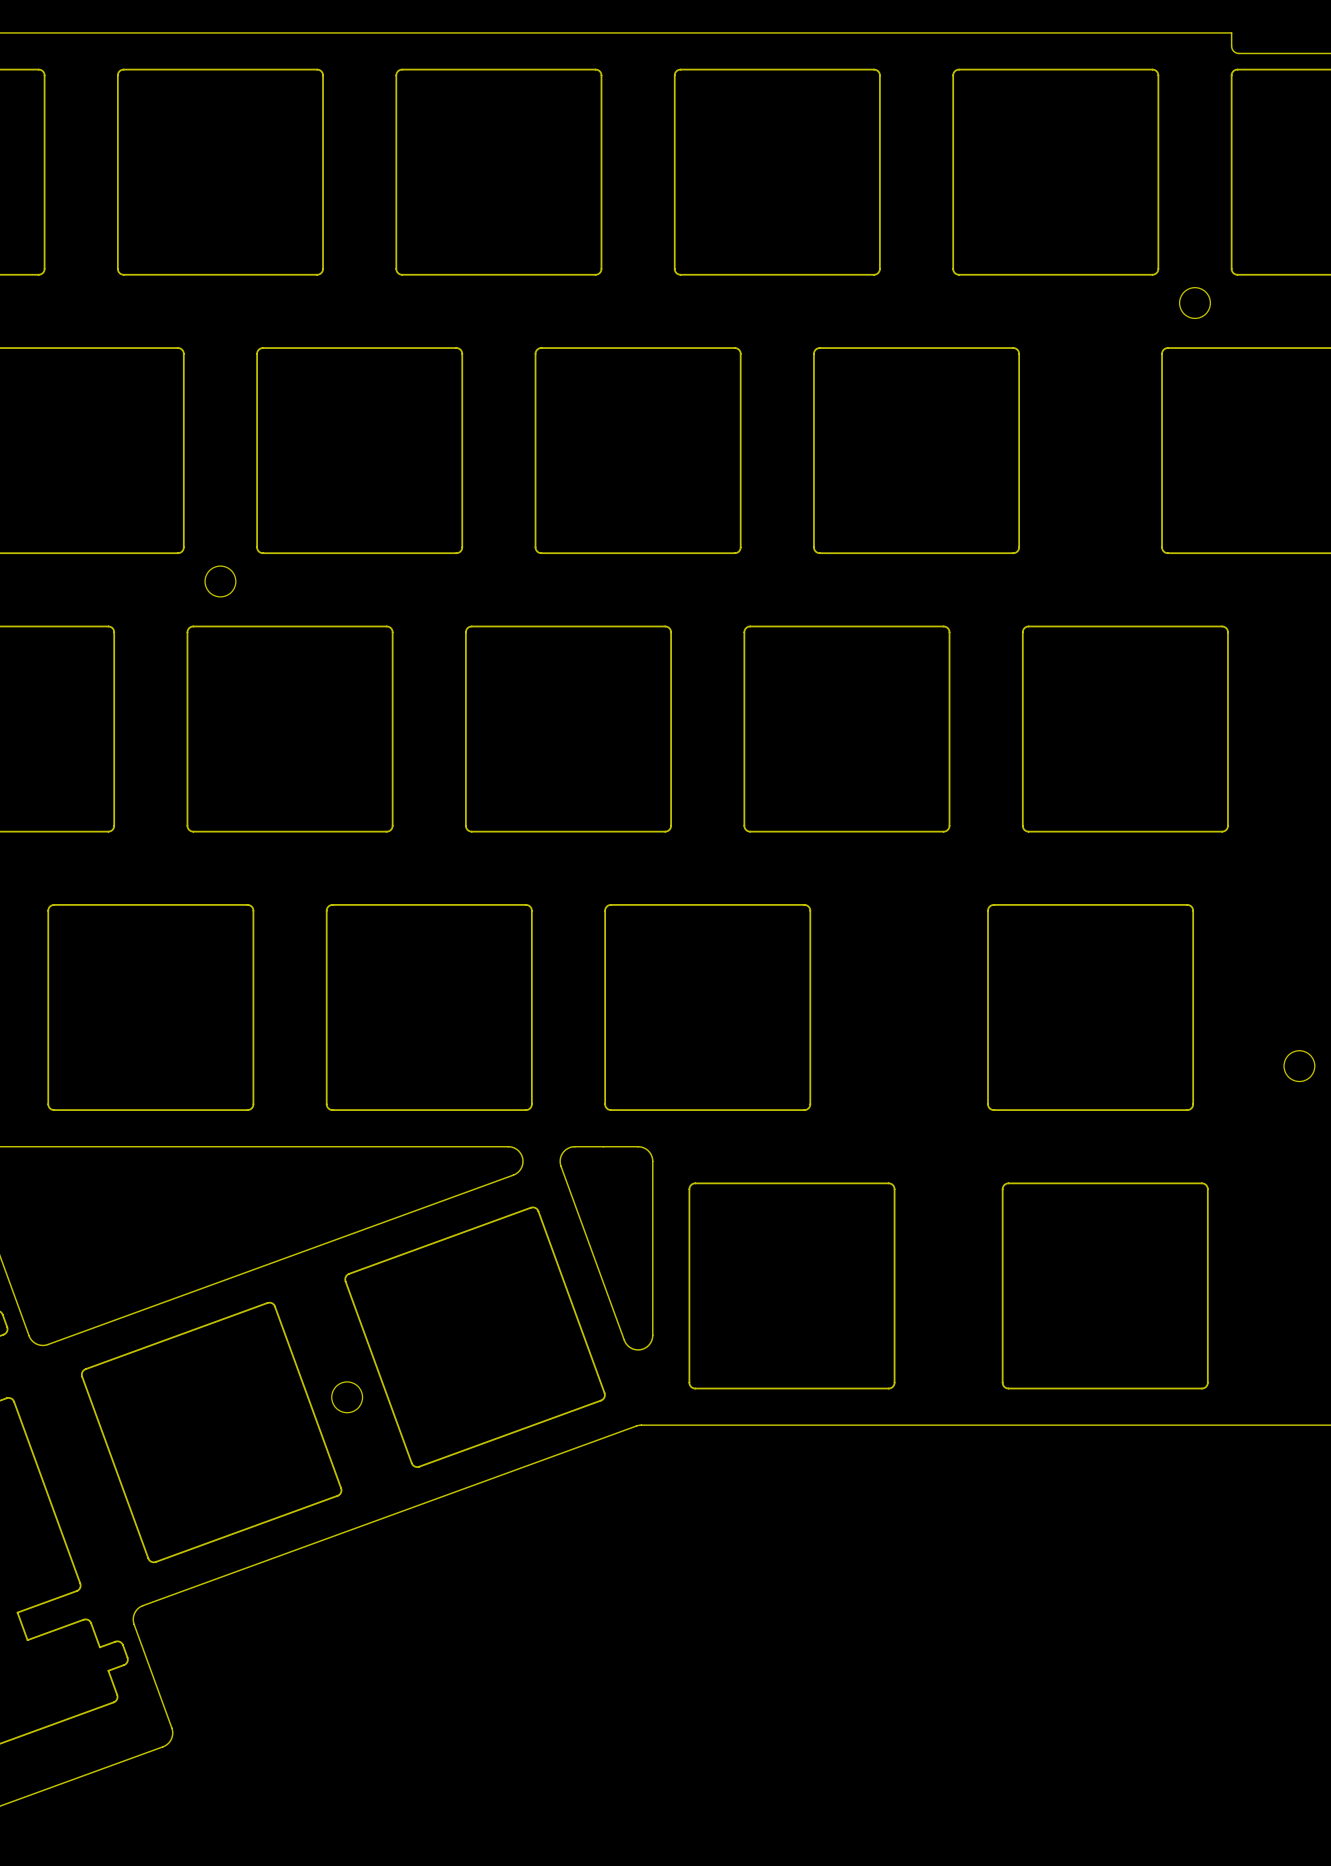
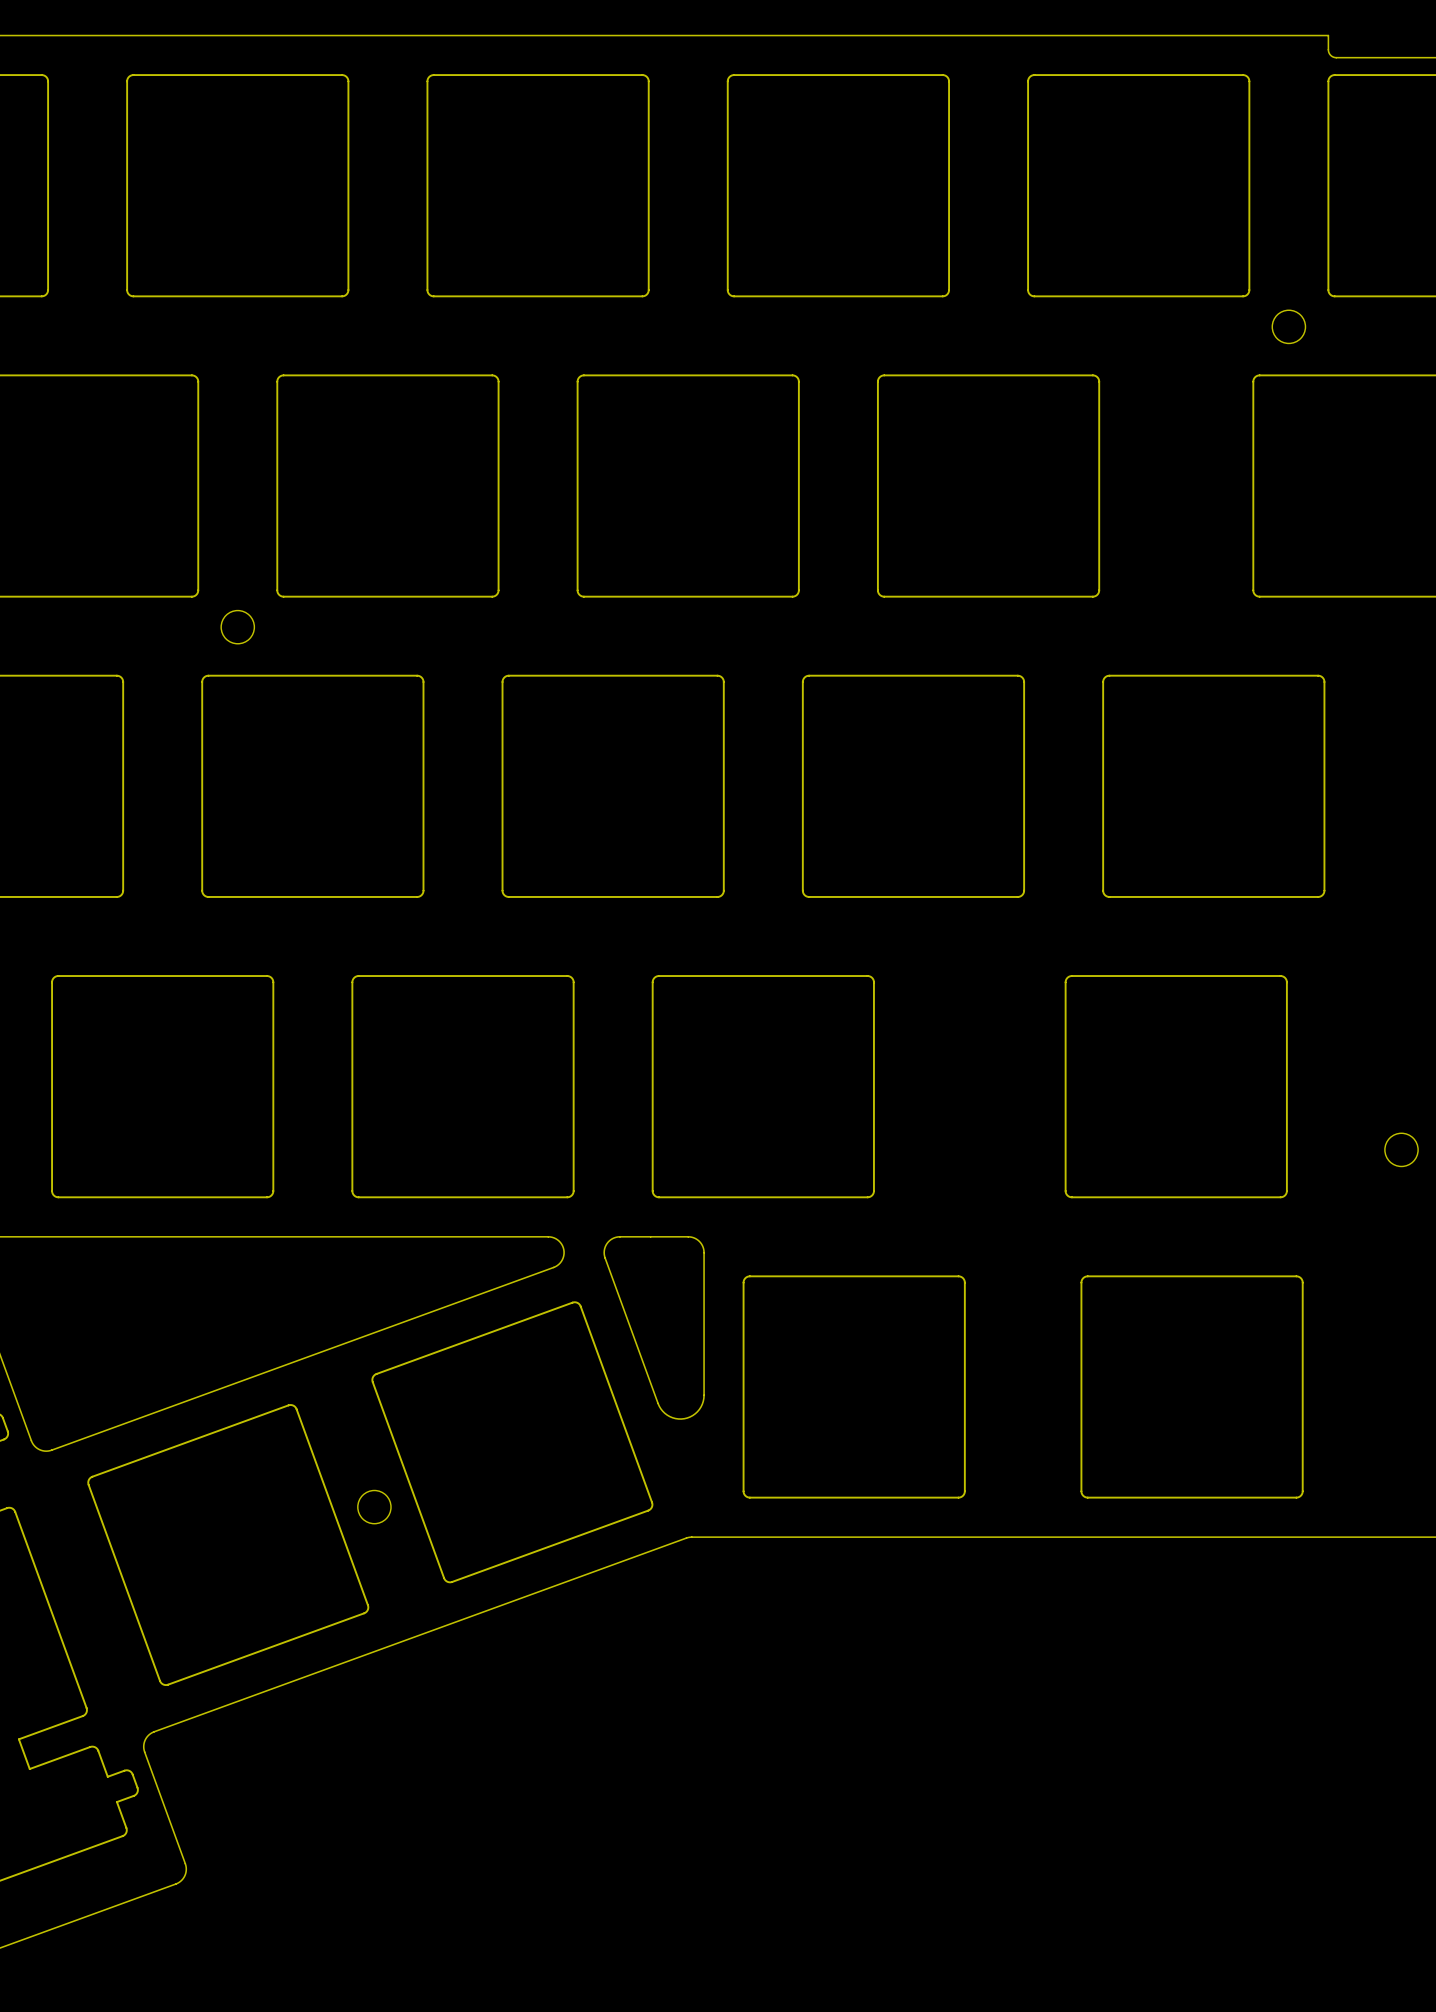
board edge: (652, 1293) (652, 1338) (647, 1346) (640, 1349) (633, 1349) (626, 1343) (610, 1301) -> (704, 1395) (702, 1404) (697, 1411) (684, 1418) (675, 1418) (667, 1415) (658, 1403)

